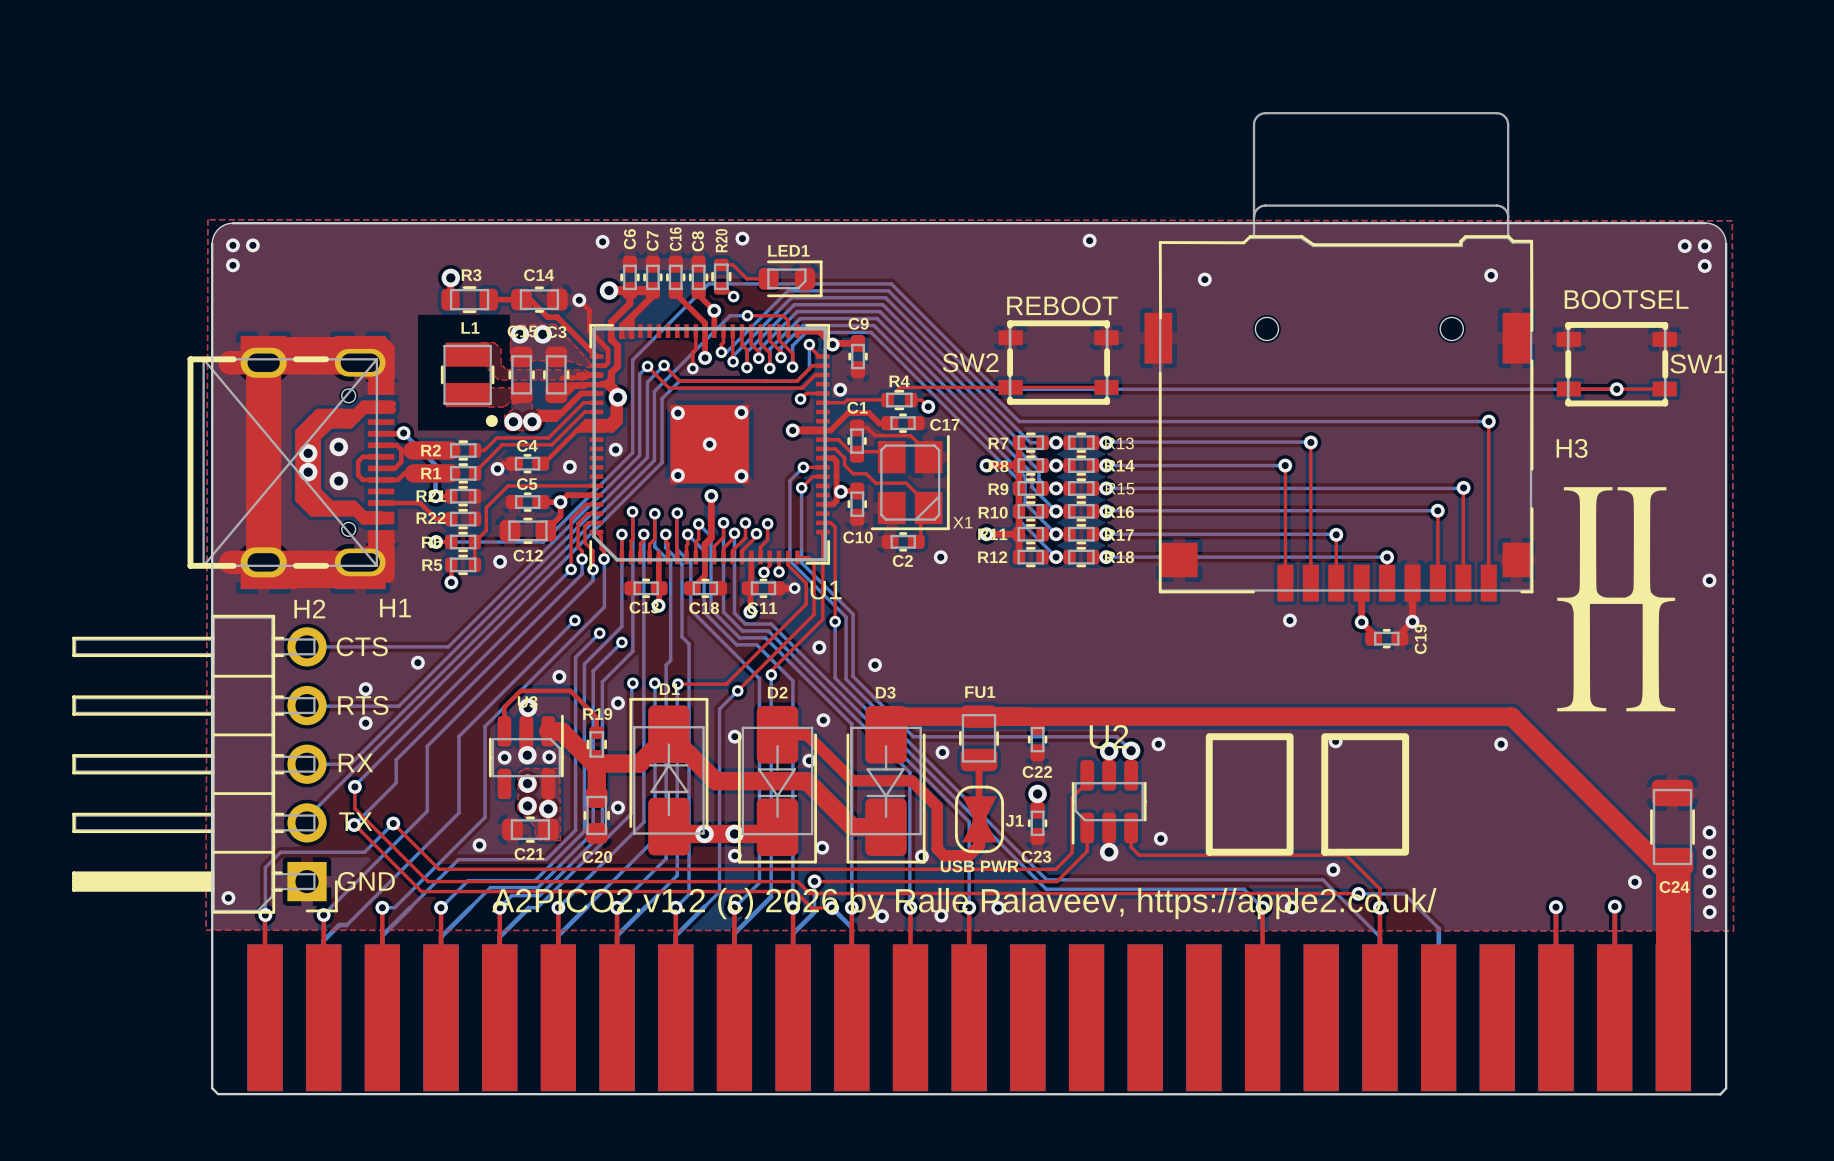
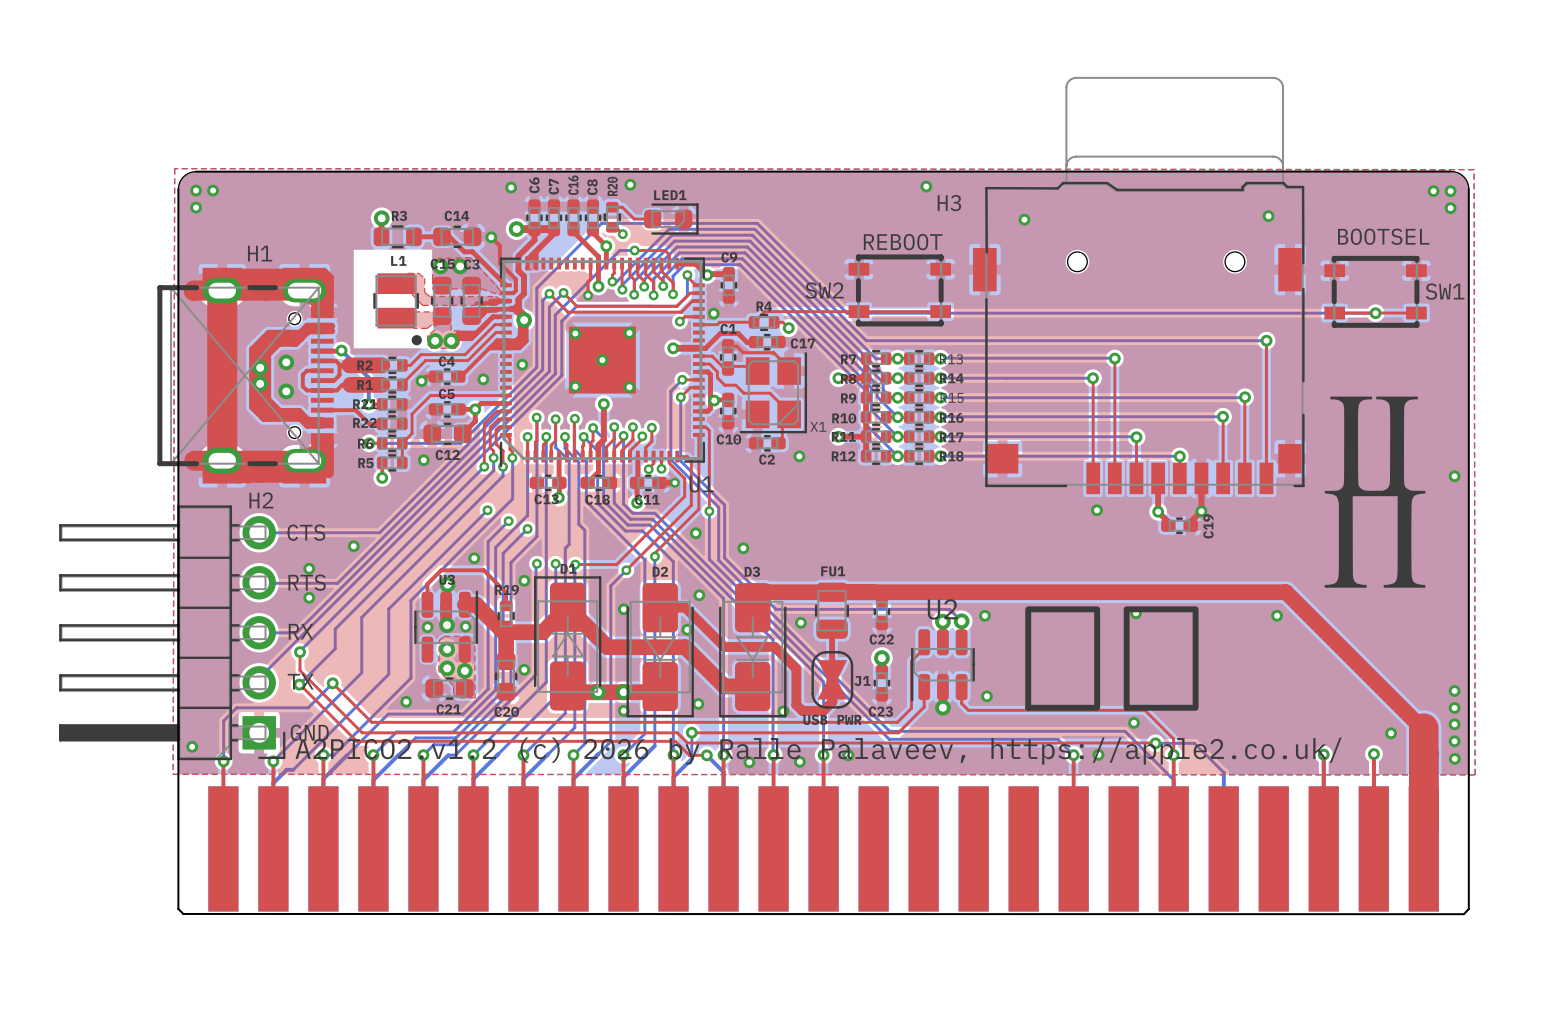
H3 name position: H3 (1572, 448) -> H3 (949, 203)
H1 name position: H1 (395, 608) -> H1 (260, 253)
C24: (1672, 827) -> none

